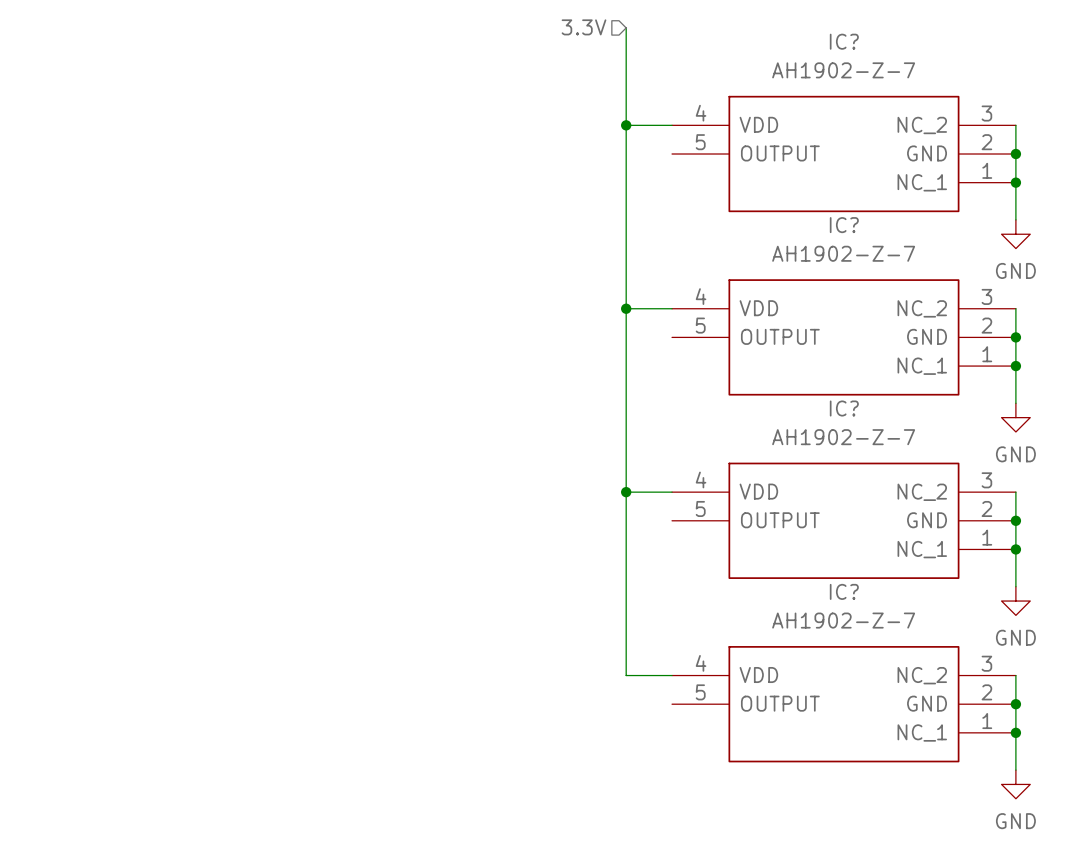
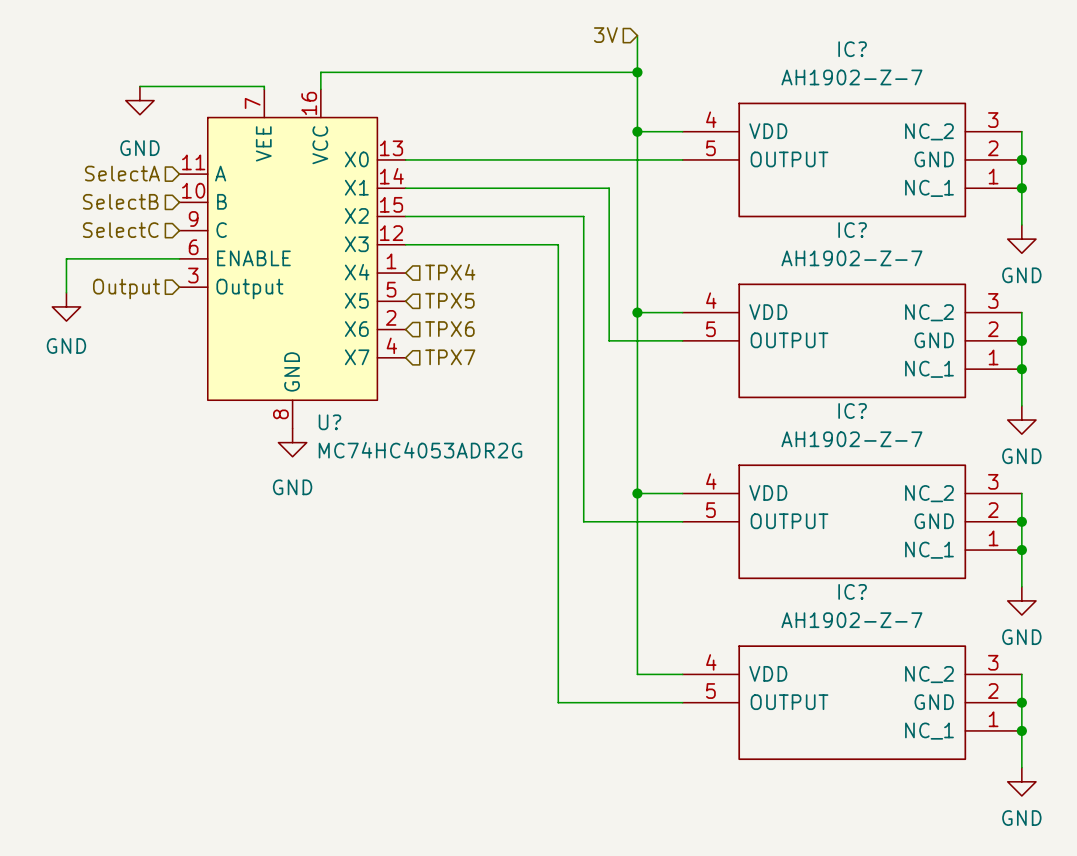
hierarchical label: 3.3V (584, 27) -> 3V (605, 35)
wire: none -> (637, 72) (320, 72) (320, 89)
junction: none -> (637, 72)
wire: none -> (139, 86) (264, 86) (264, 89)
power symbol: none -> GND (139, 100)
wire: none -> (405, 159) (682, 159)
hierarchical label: none -> SelectA (122, 173)
wire: none -> (405, 188) (609, 188) (609, 340) (682, 340)
hierarchical label: none -> SelectB (120, 201)
wire: none -> (405, 216) (583, 216) (583, 521) (682, 521)
hierarchical label: none -> SelectC (120, 230)
wire: none -> (405, 244) (558, 244) (558, 702) (682, 702)
wire: none -> (179, 258) (66, 258) (66, 292)
U?: none -> MC74HC4053ADR2G (292, 258)
hierarchical label: none -> TPX4 (450, 272)
hierarchical label: none -> Output (126, 288)
hierarchical label: none -> TPX5 (449, 300)
power symbol: none -> GND (66, 306)
hierarchical label: none -> TPX6 (449, 329)
hierarchical label: none -> TPX7 (450, 357)
power symbol: none -> GND (292, 442)

